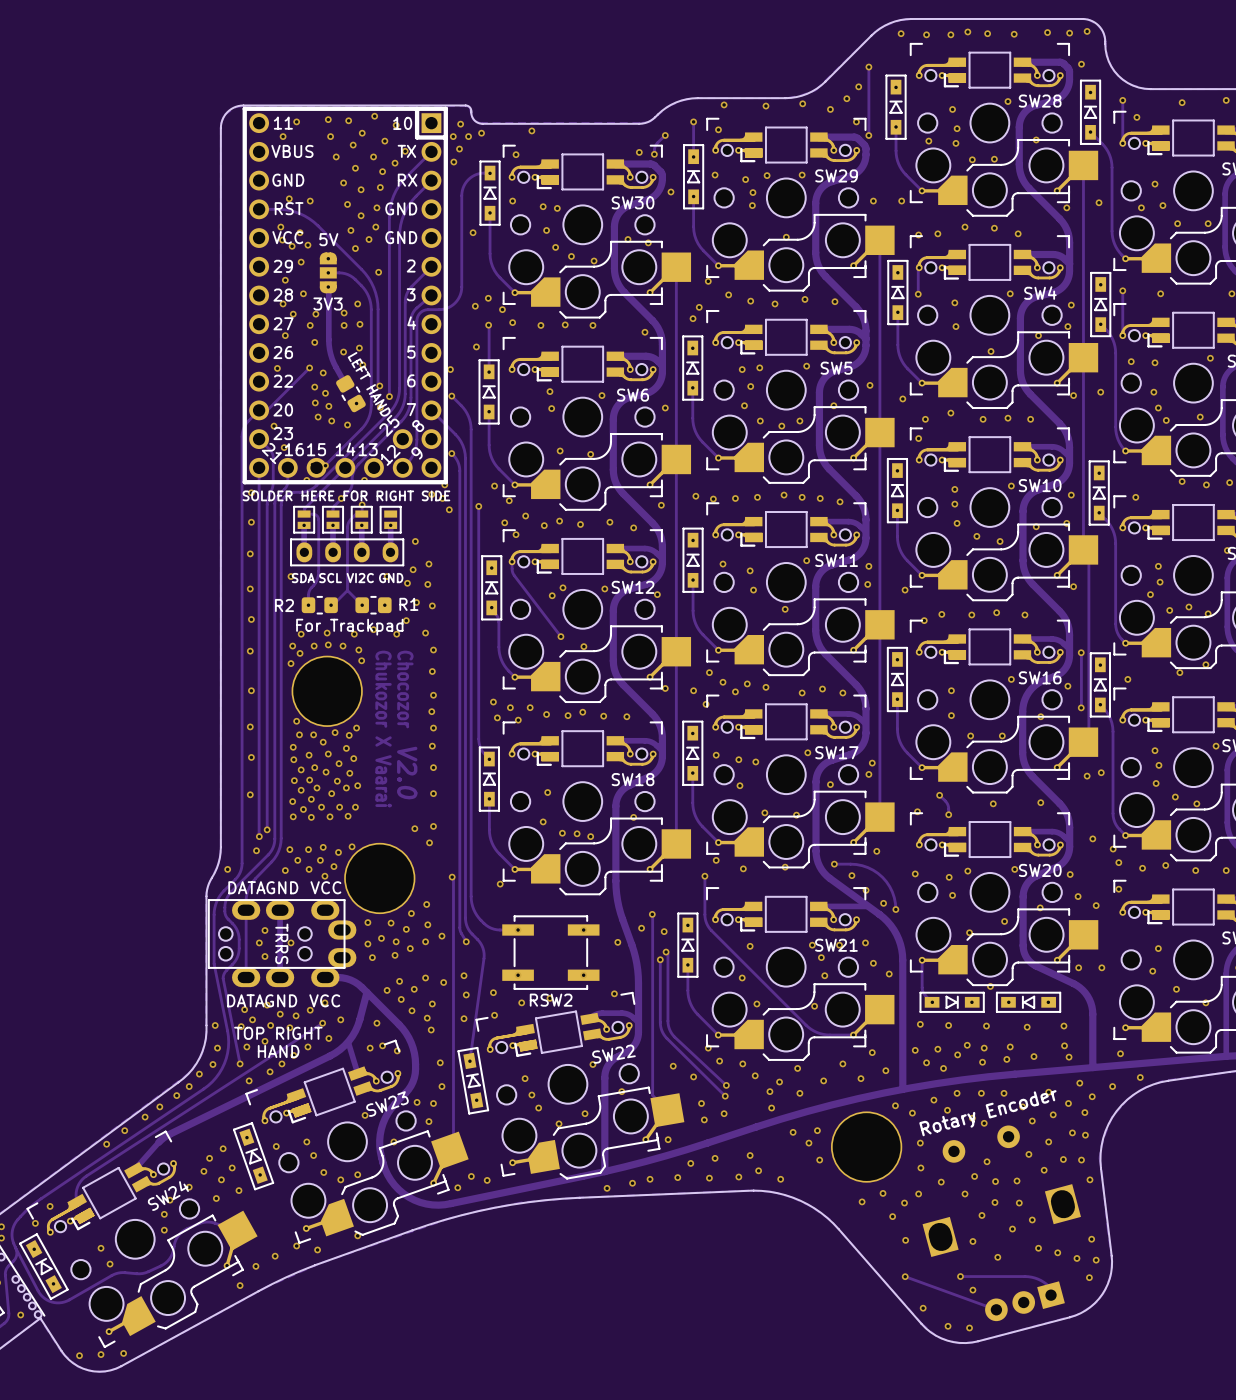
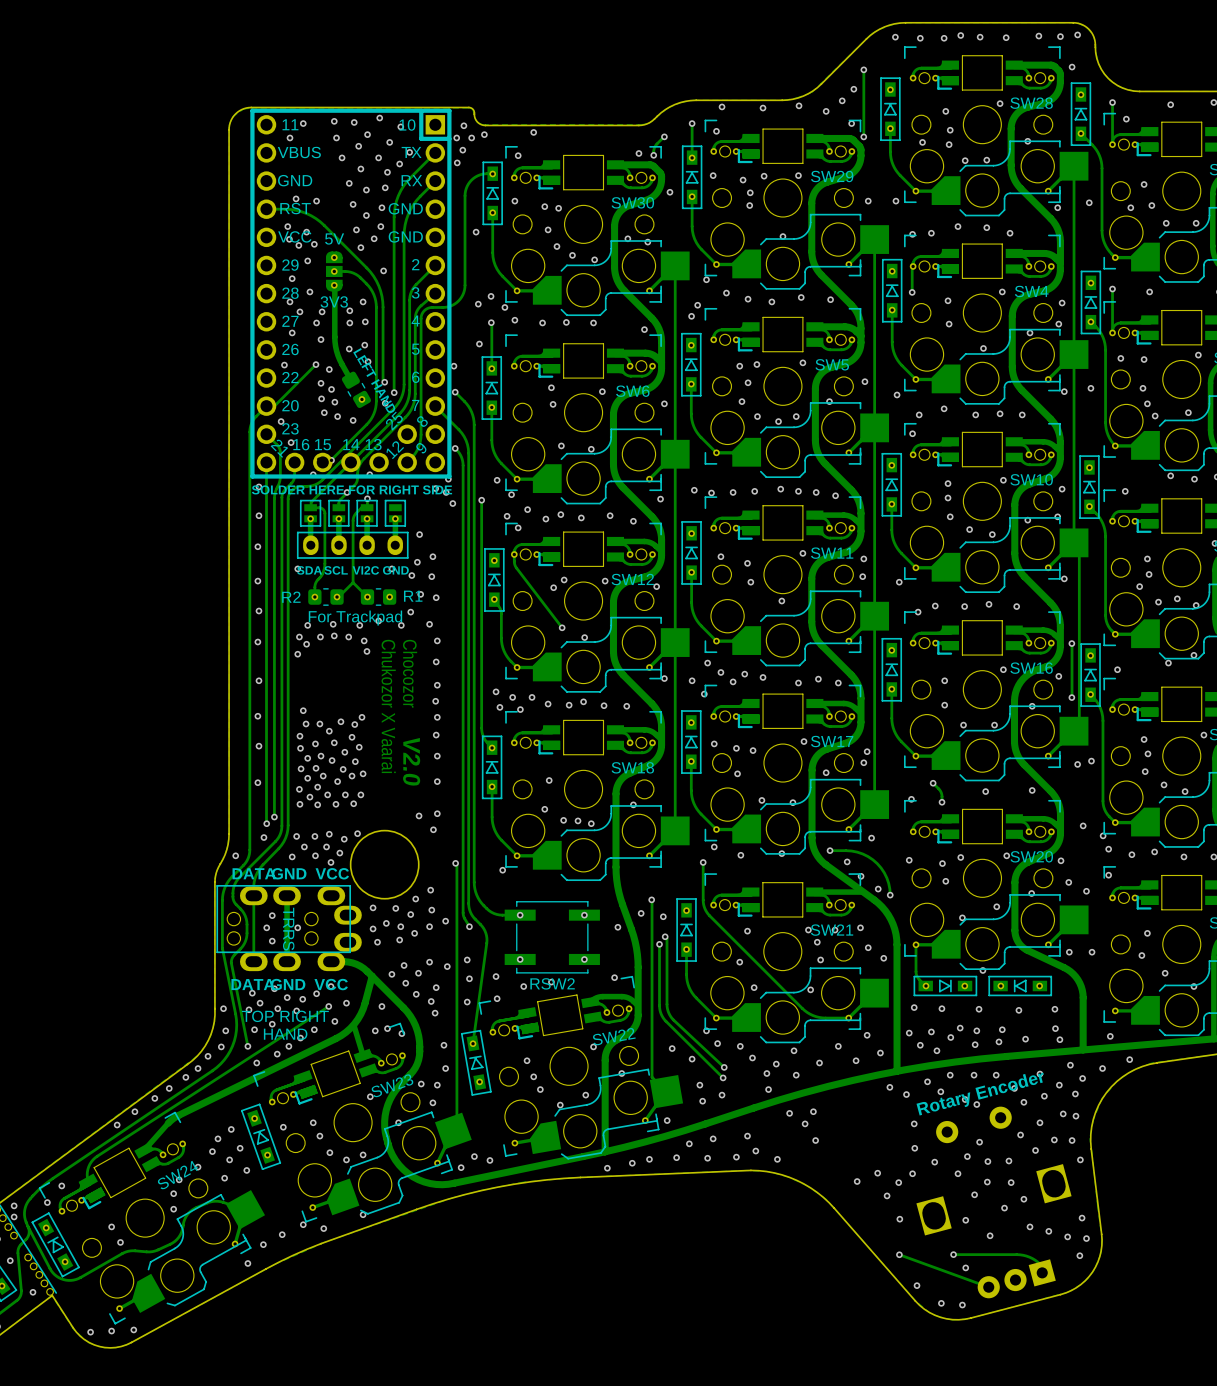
part: (327, 691) -> none
part: (866, 1147) -> none

